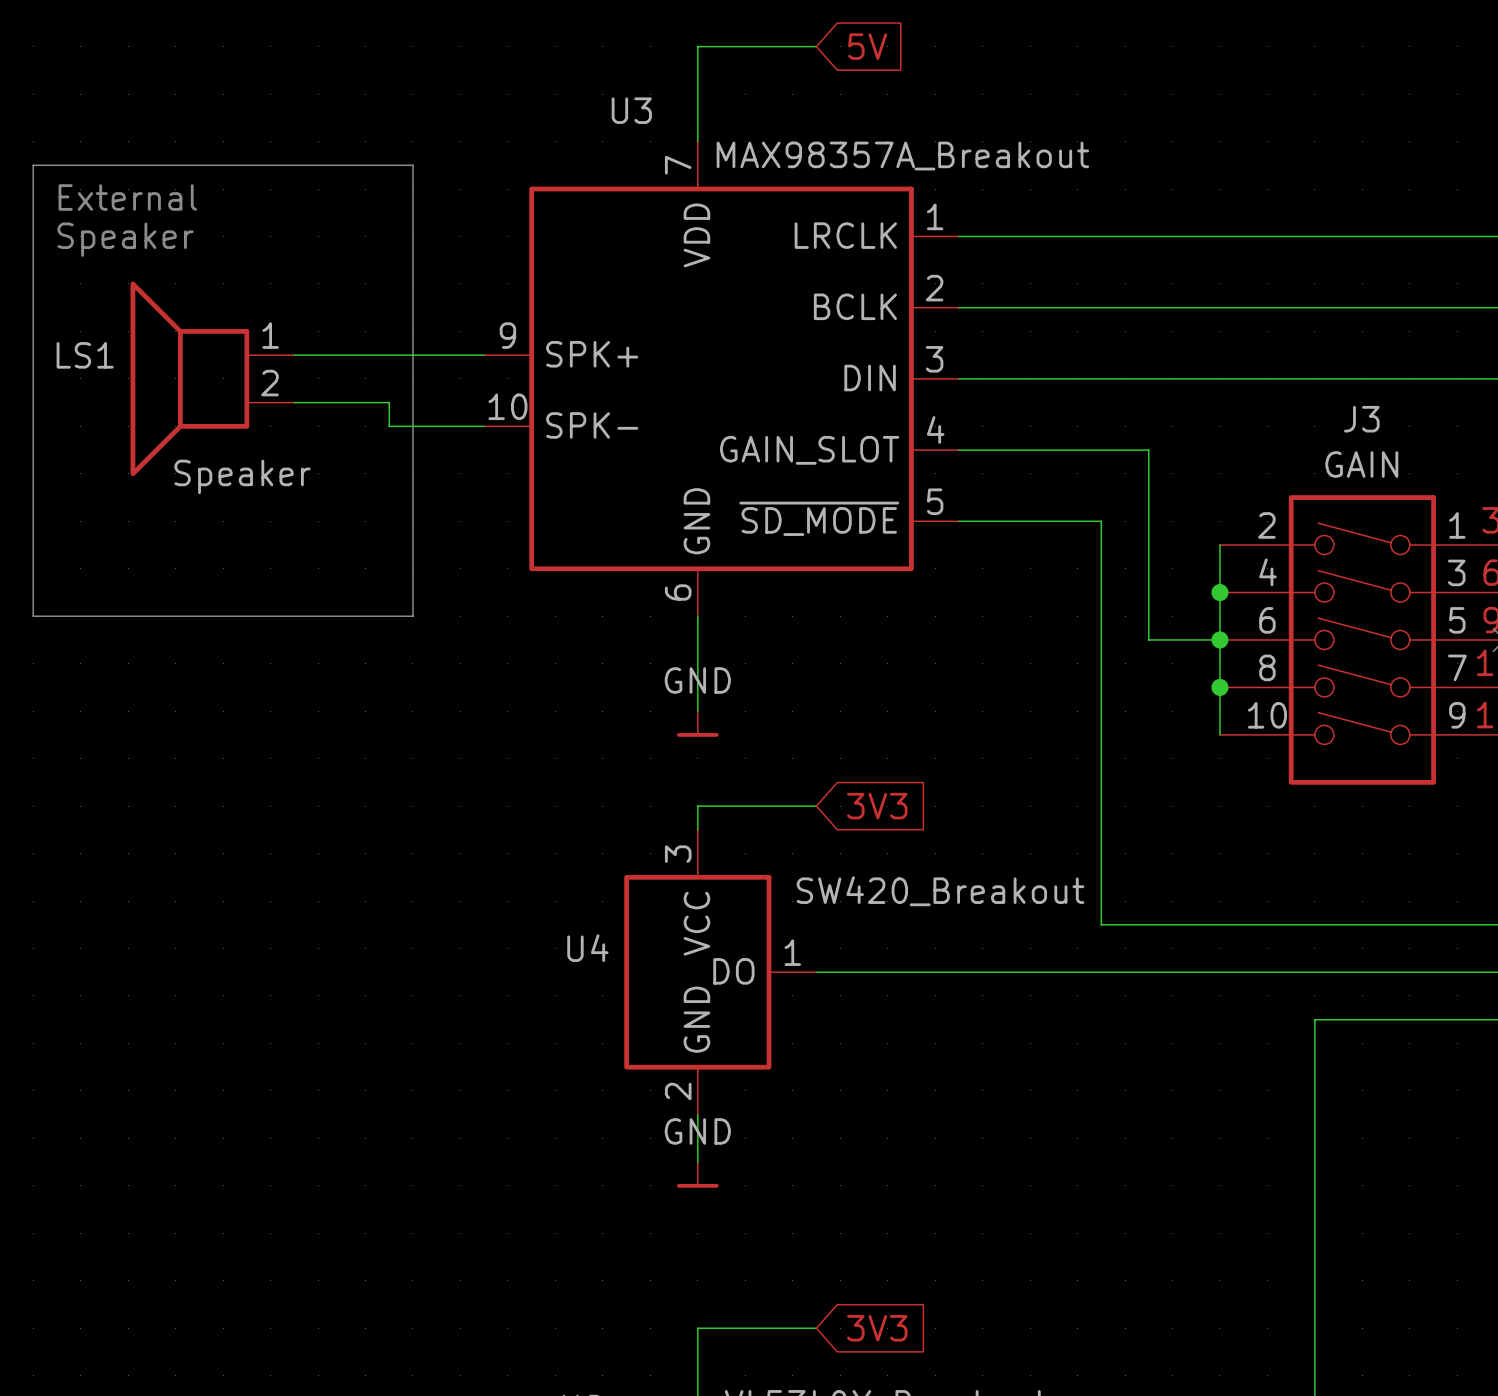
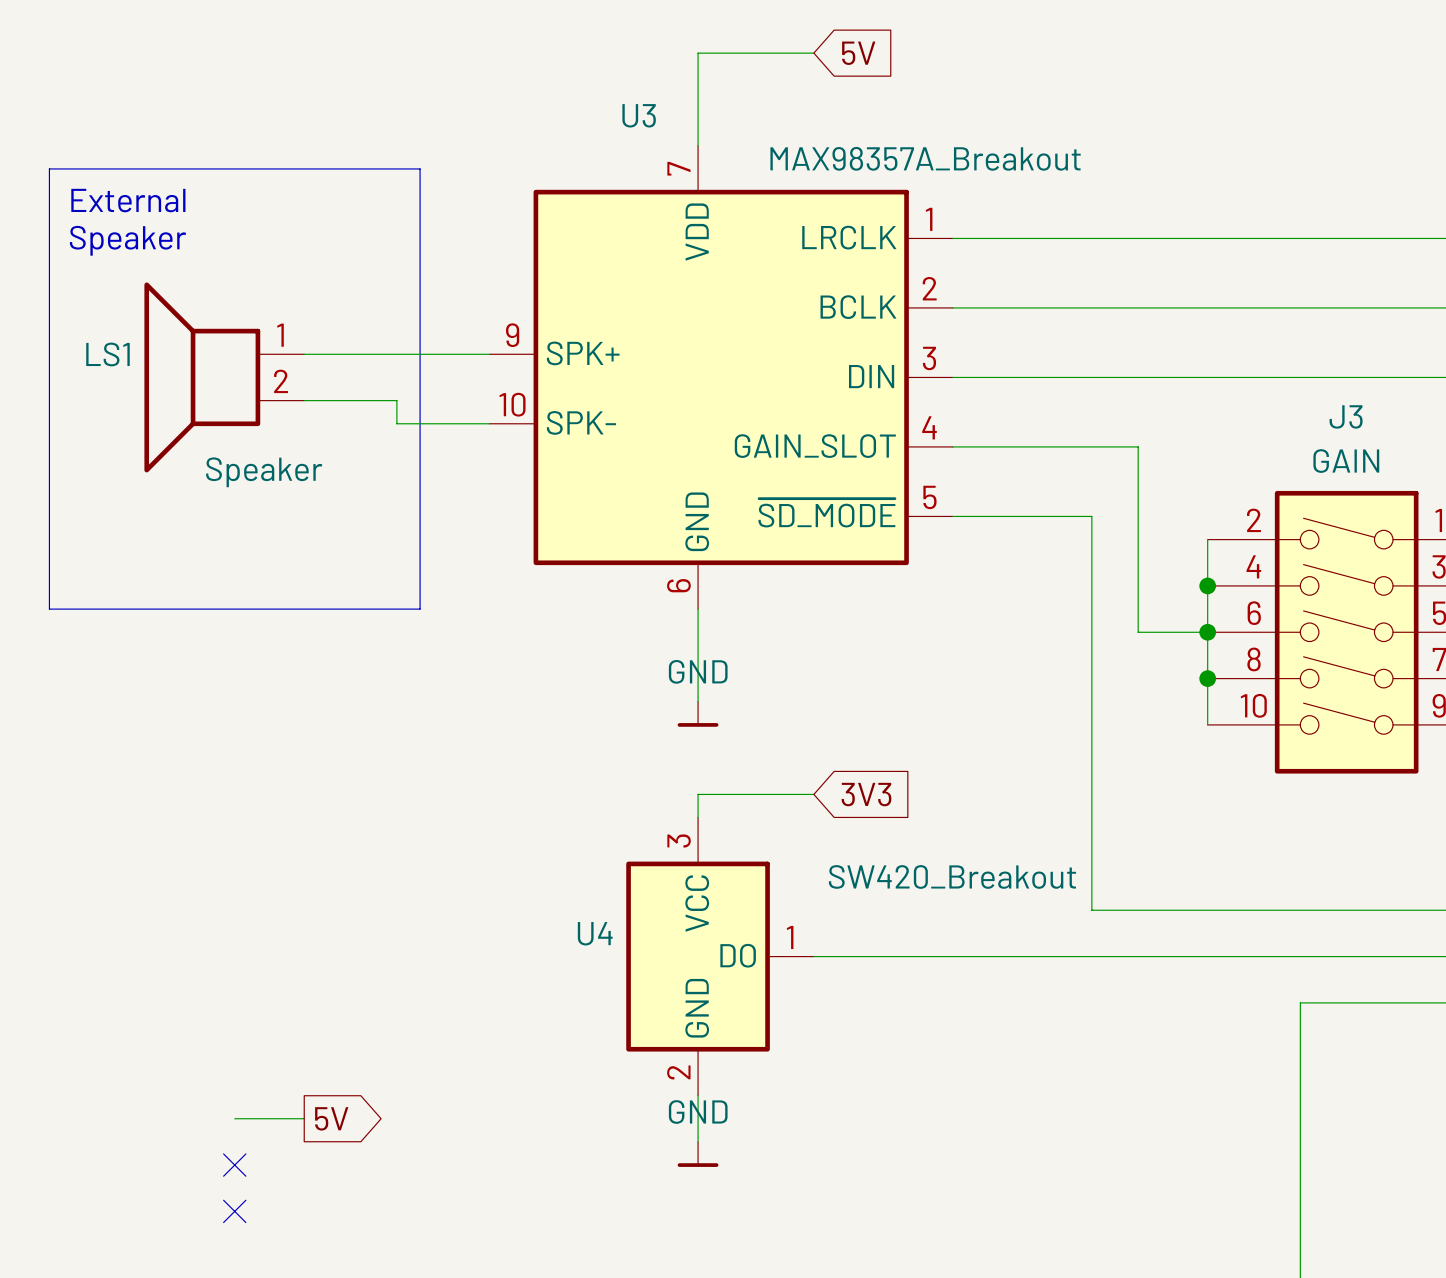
wire: none -> (234, 1118) (304, 1118)
global label: none -> 5V (331, 1118)
no-connect mark: none -> (234, 1165)
no-connect mark: none -> (234, 1211)

